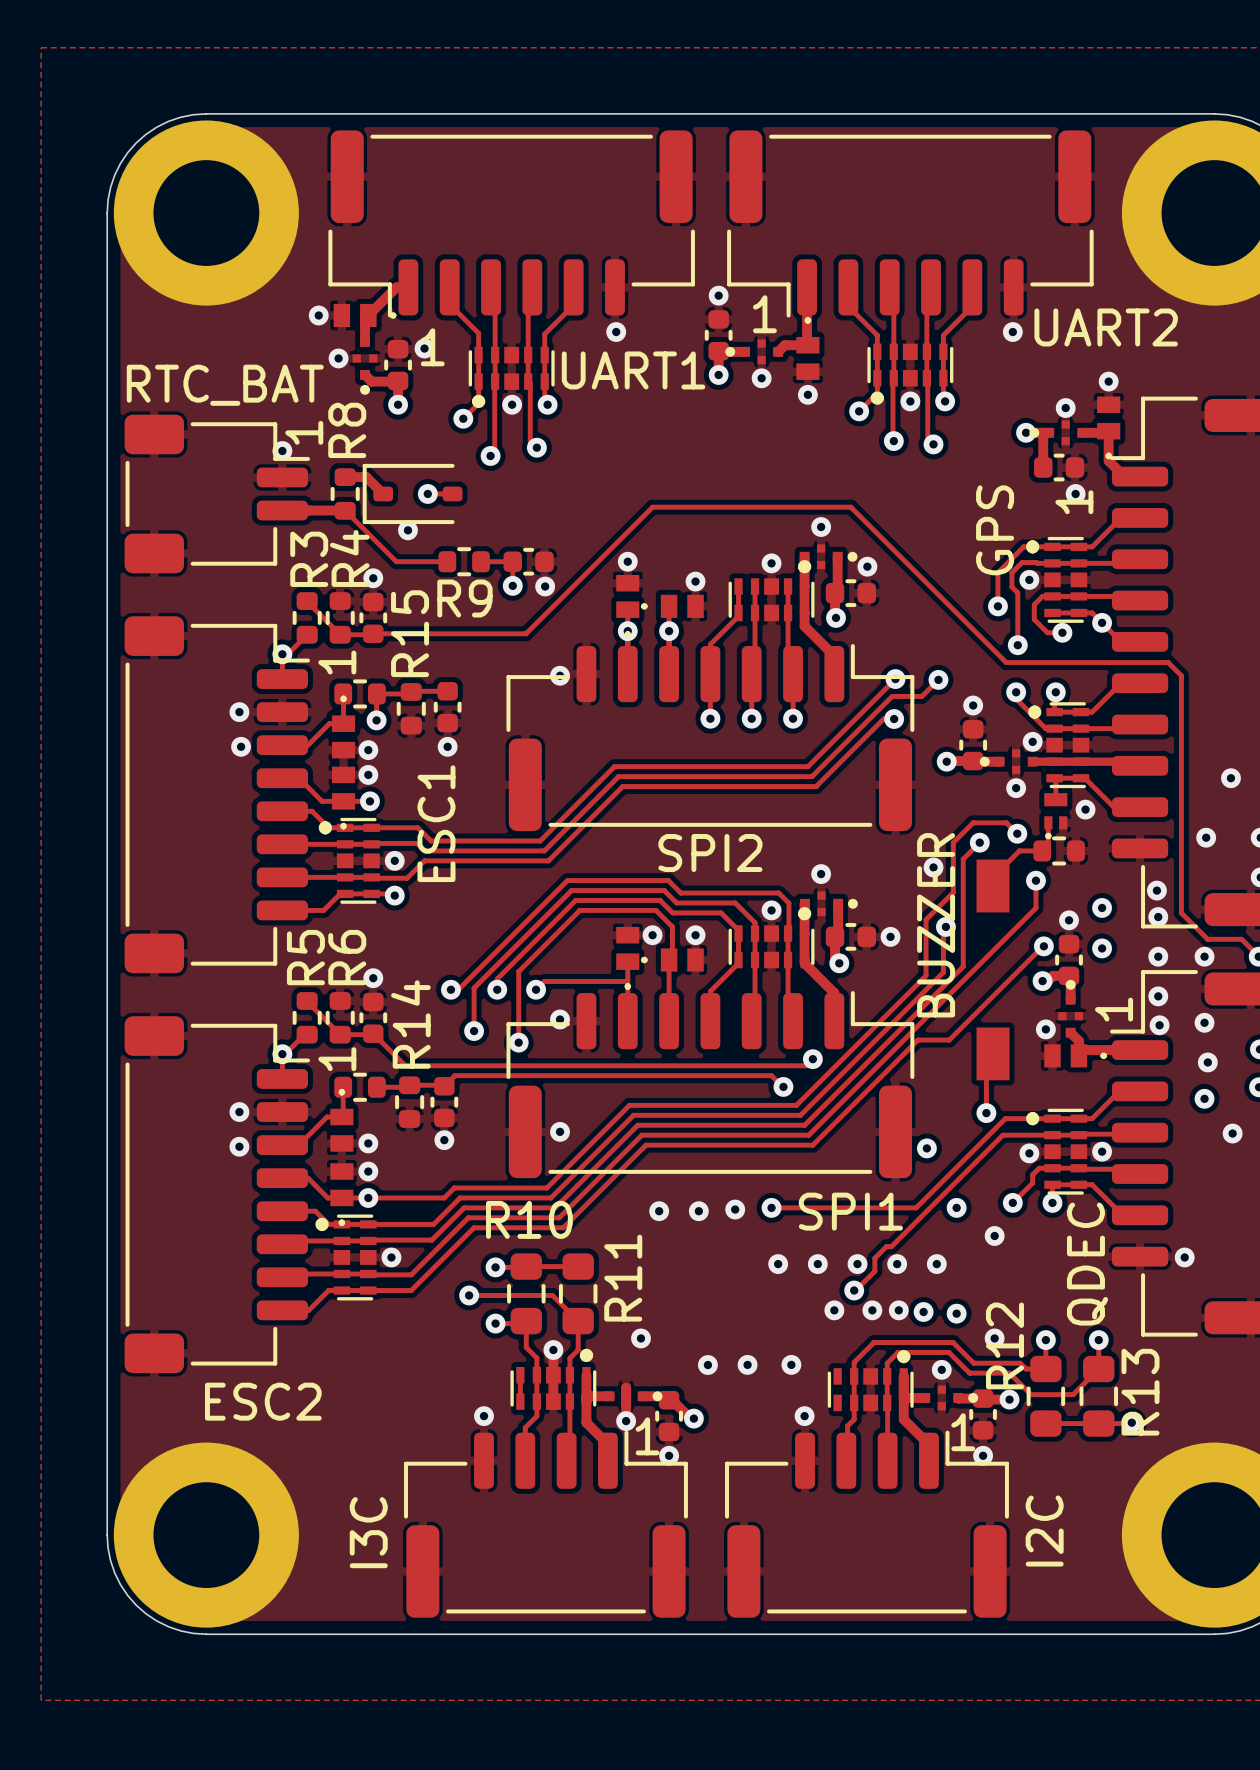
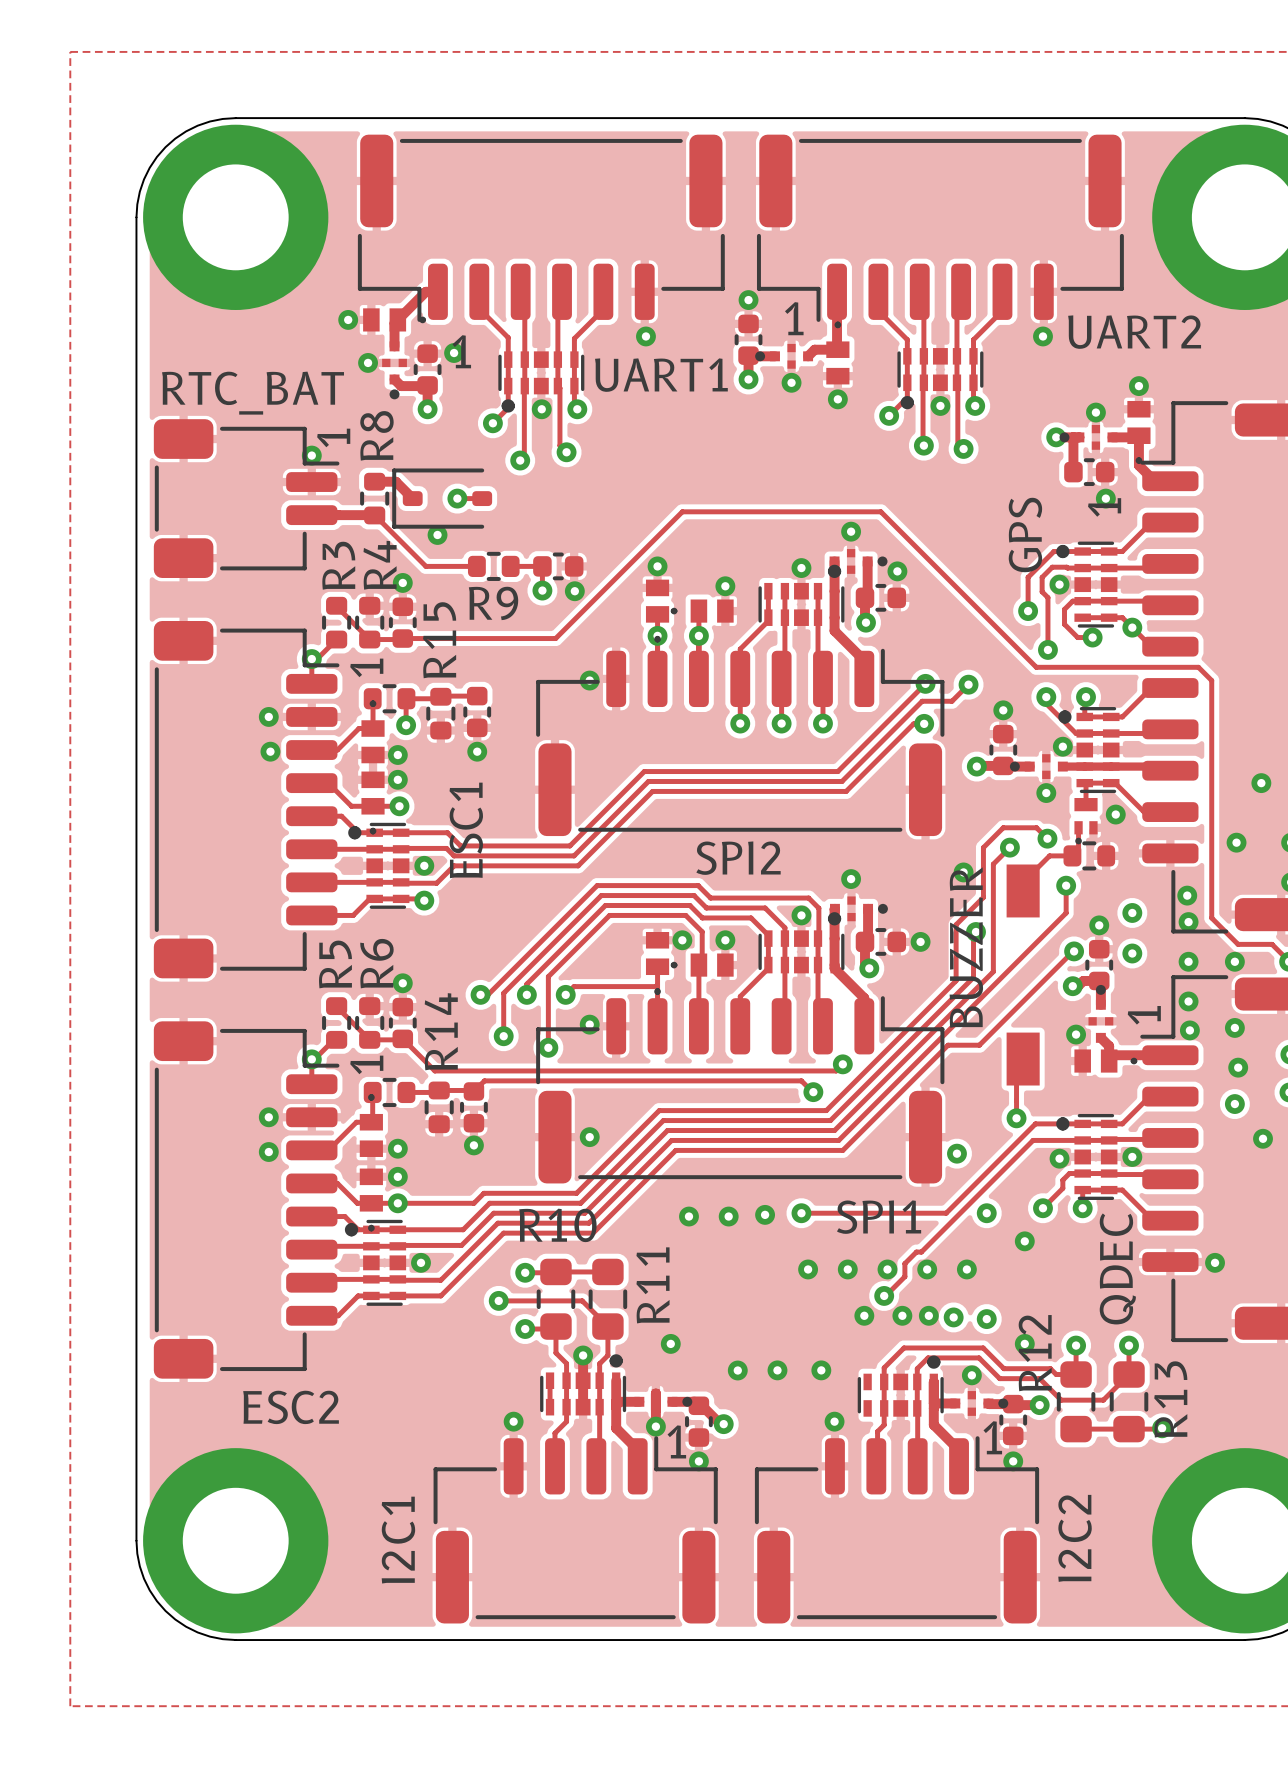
part value: I2C (1044, 1531) -> I2C2 (1075, 1538)
part value: I3C (368, 1532) -> I2C1 (398, 1540)

